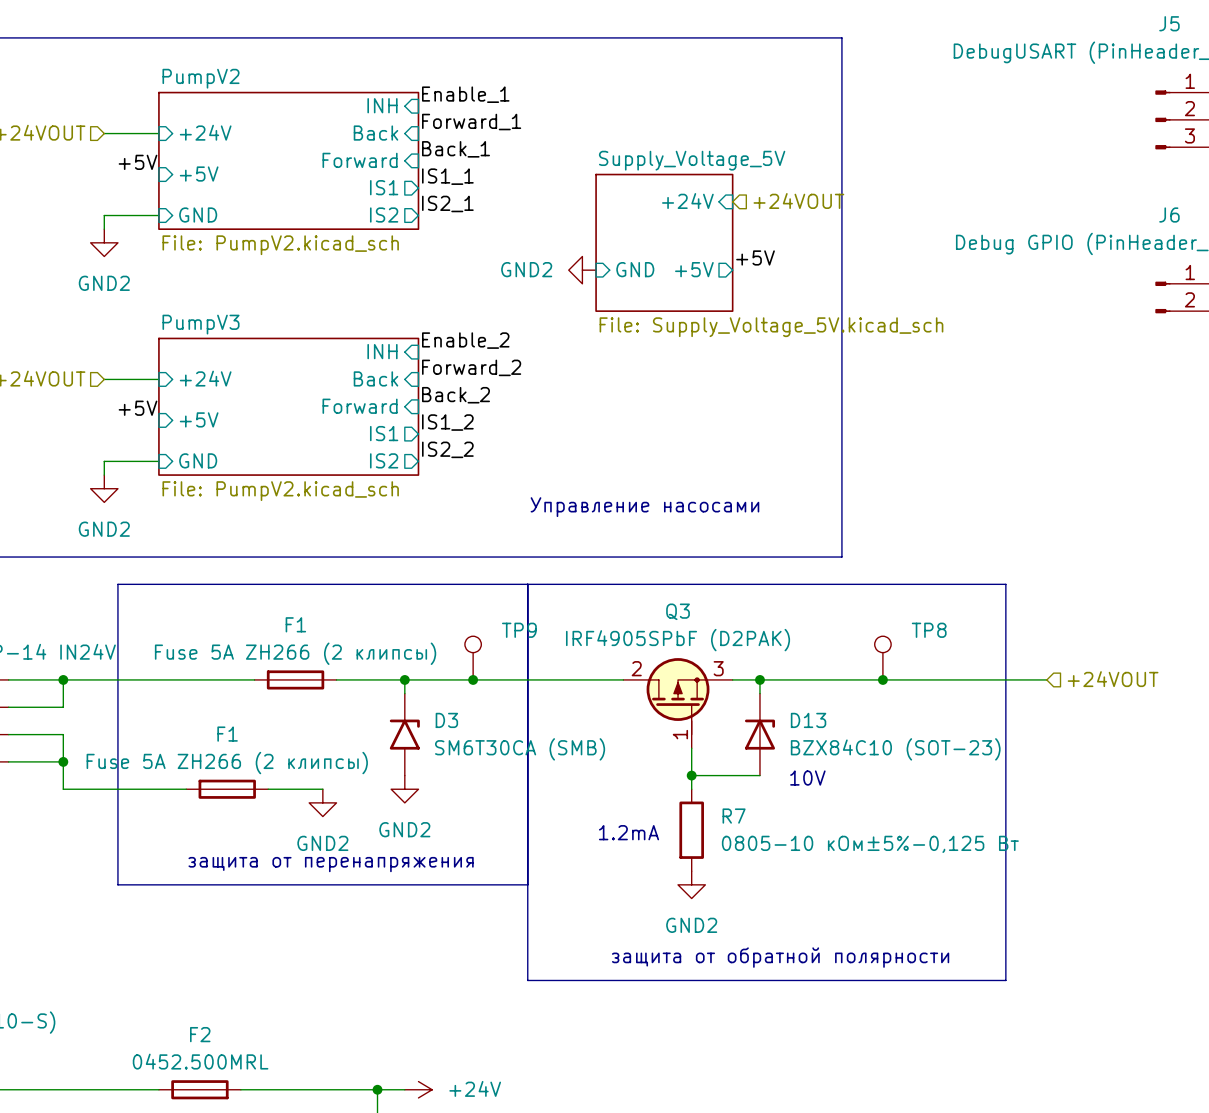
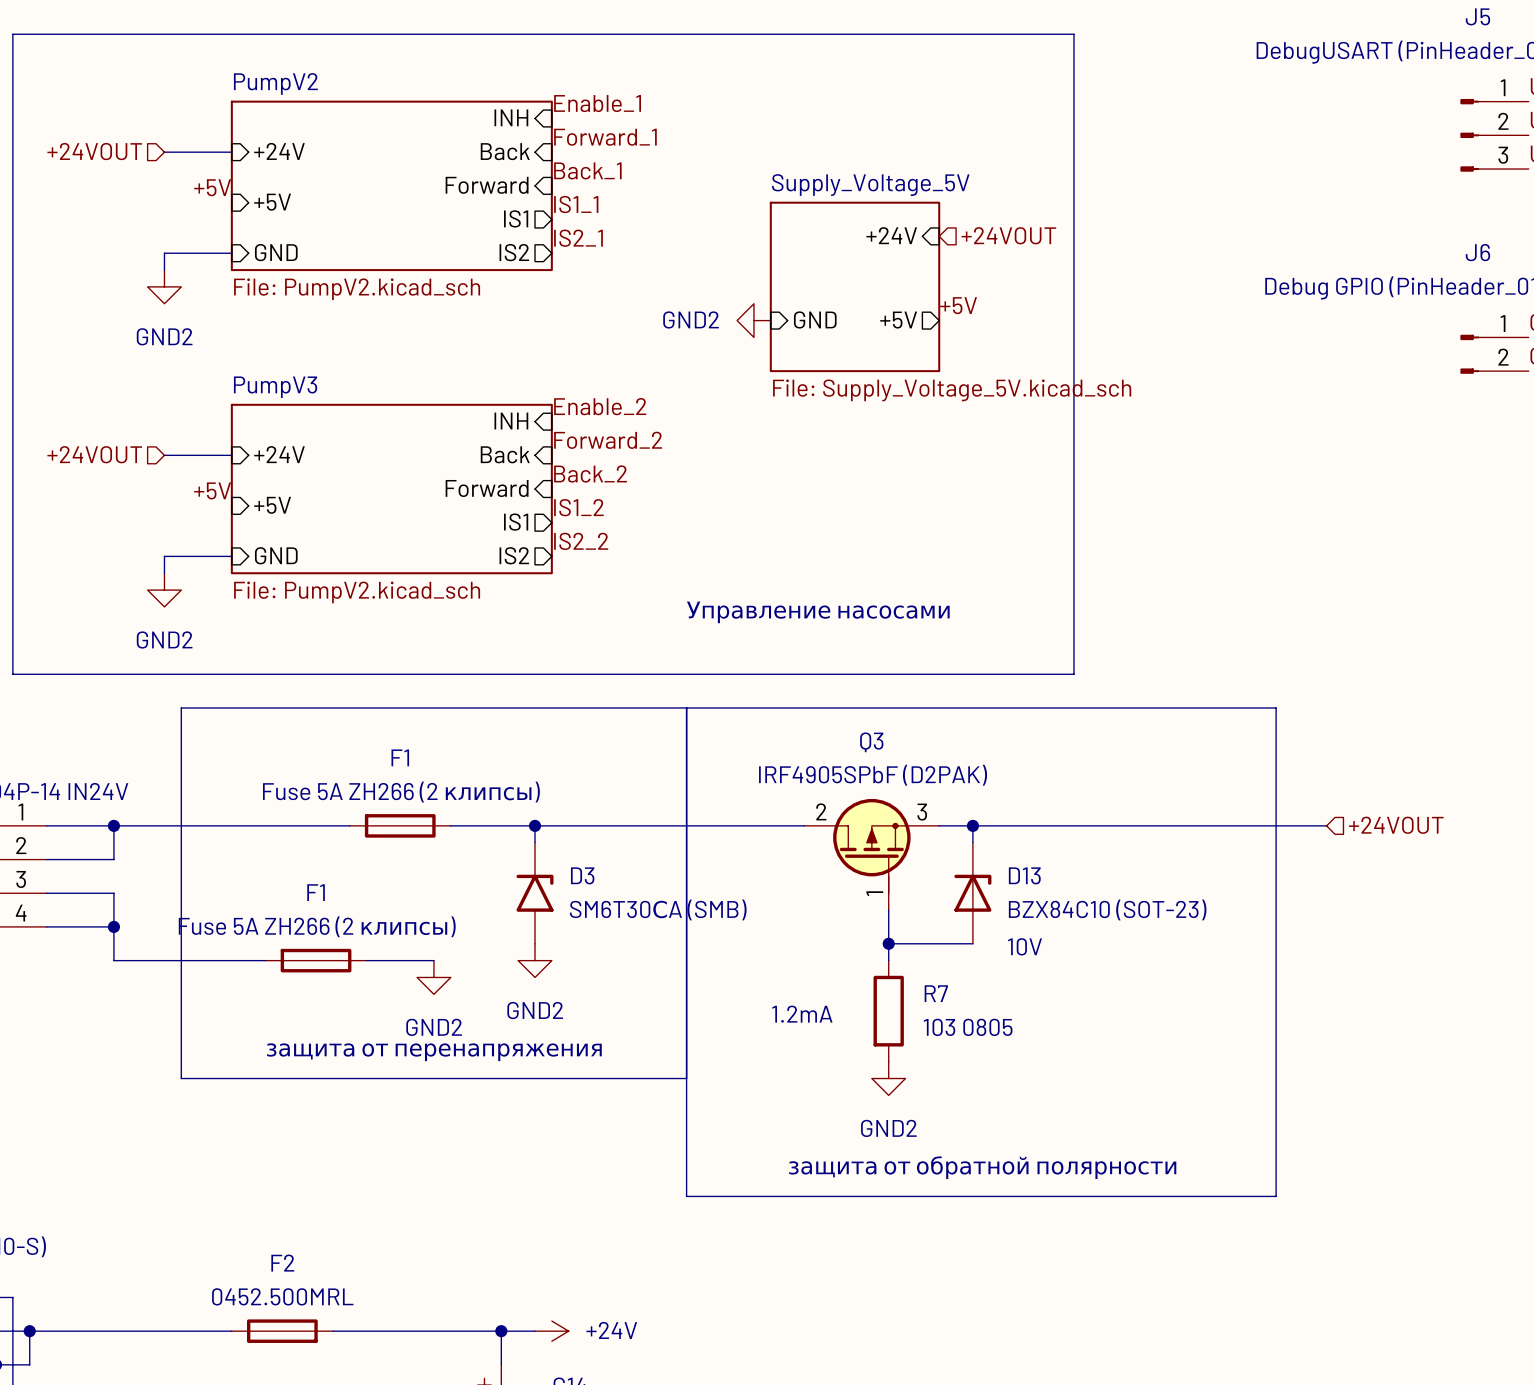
TP9: (473, 658) -> none
TP8: (882, 658) -> none
junction: (473, 679) -> none
junction: (882, 679) -> none
R7 value: 0805-10 кОм±5%-0,125 Вт (870, 844) -> 103 0805 (968, 1027)

